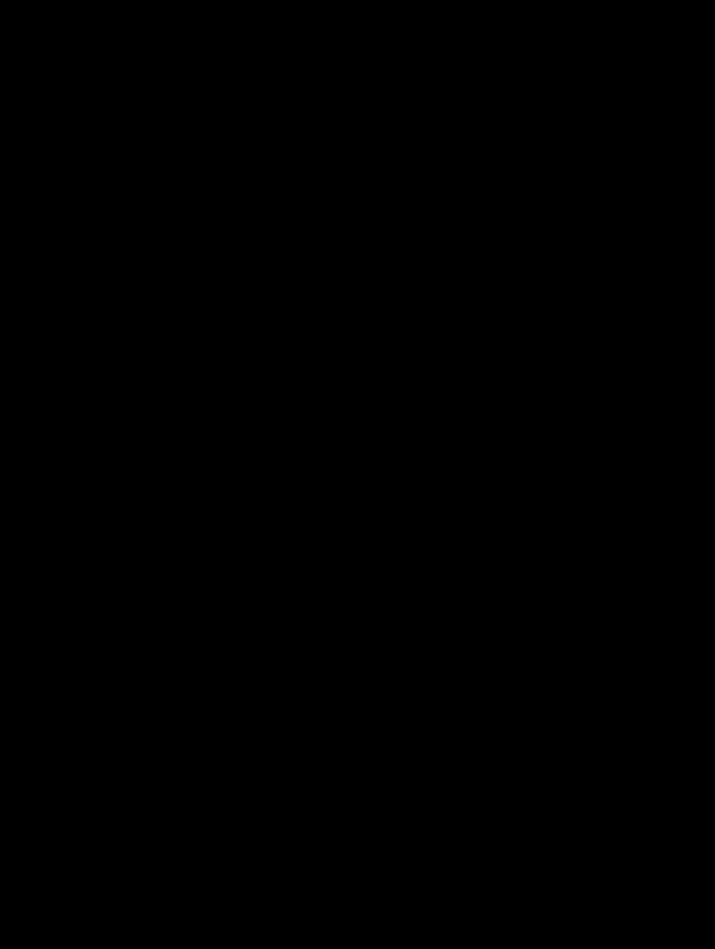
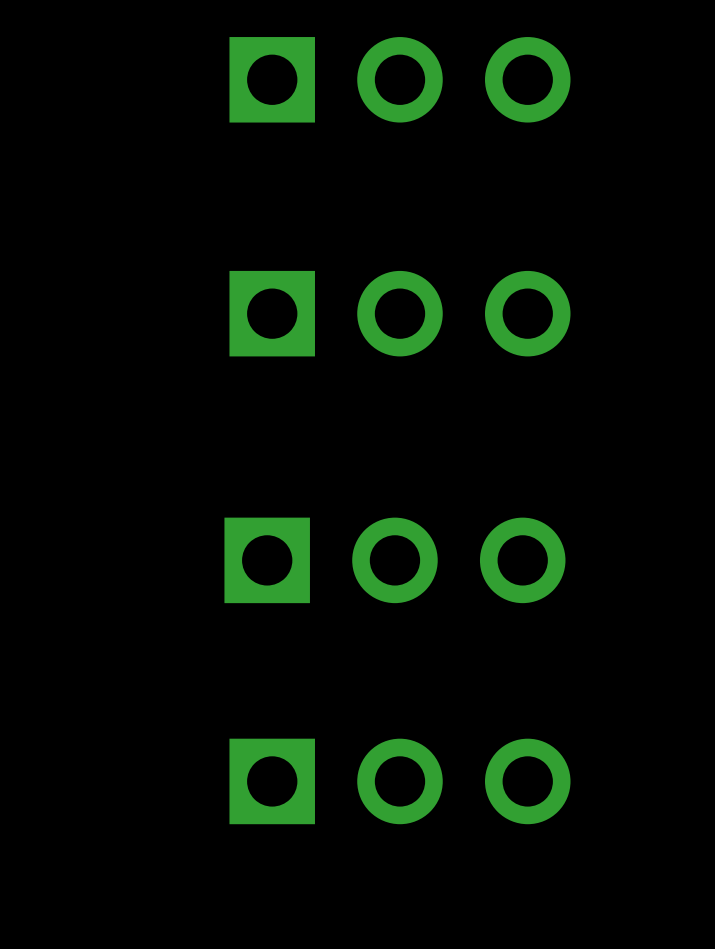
part: none -> (399, 79)
part: none -> (399, 313)
part: none -> (394, 560)
part: none -> (399, 781)

